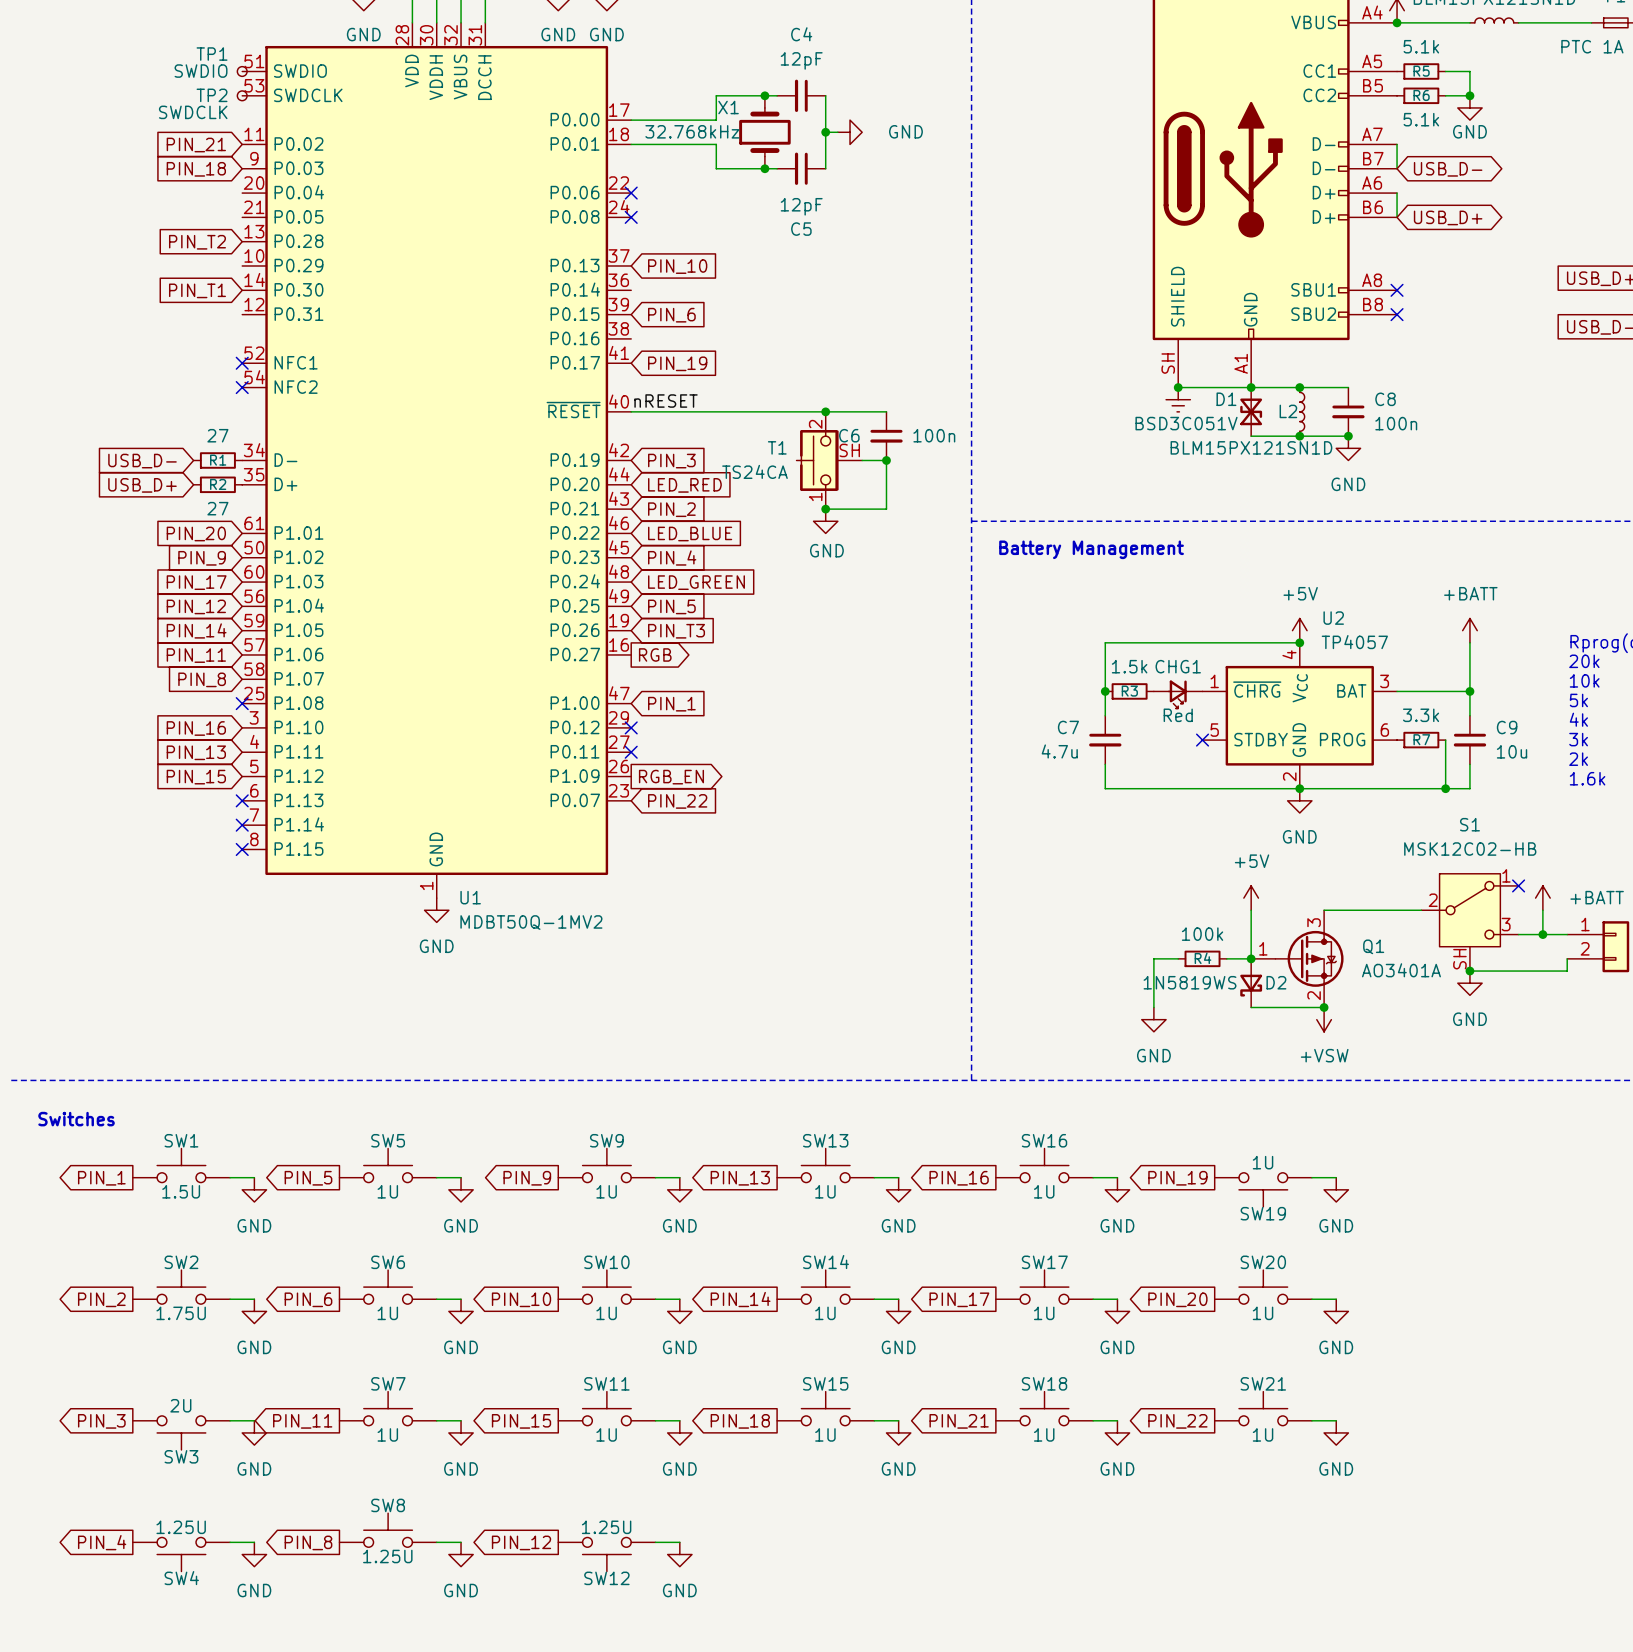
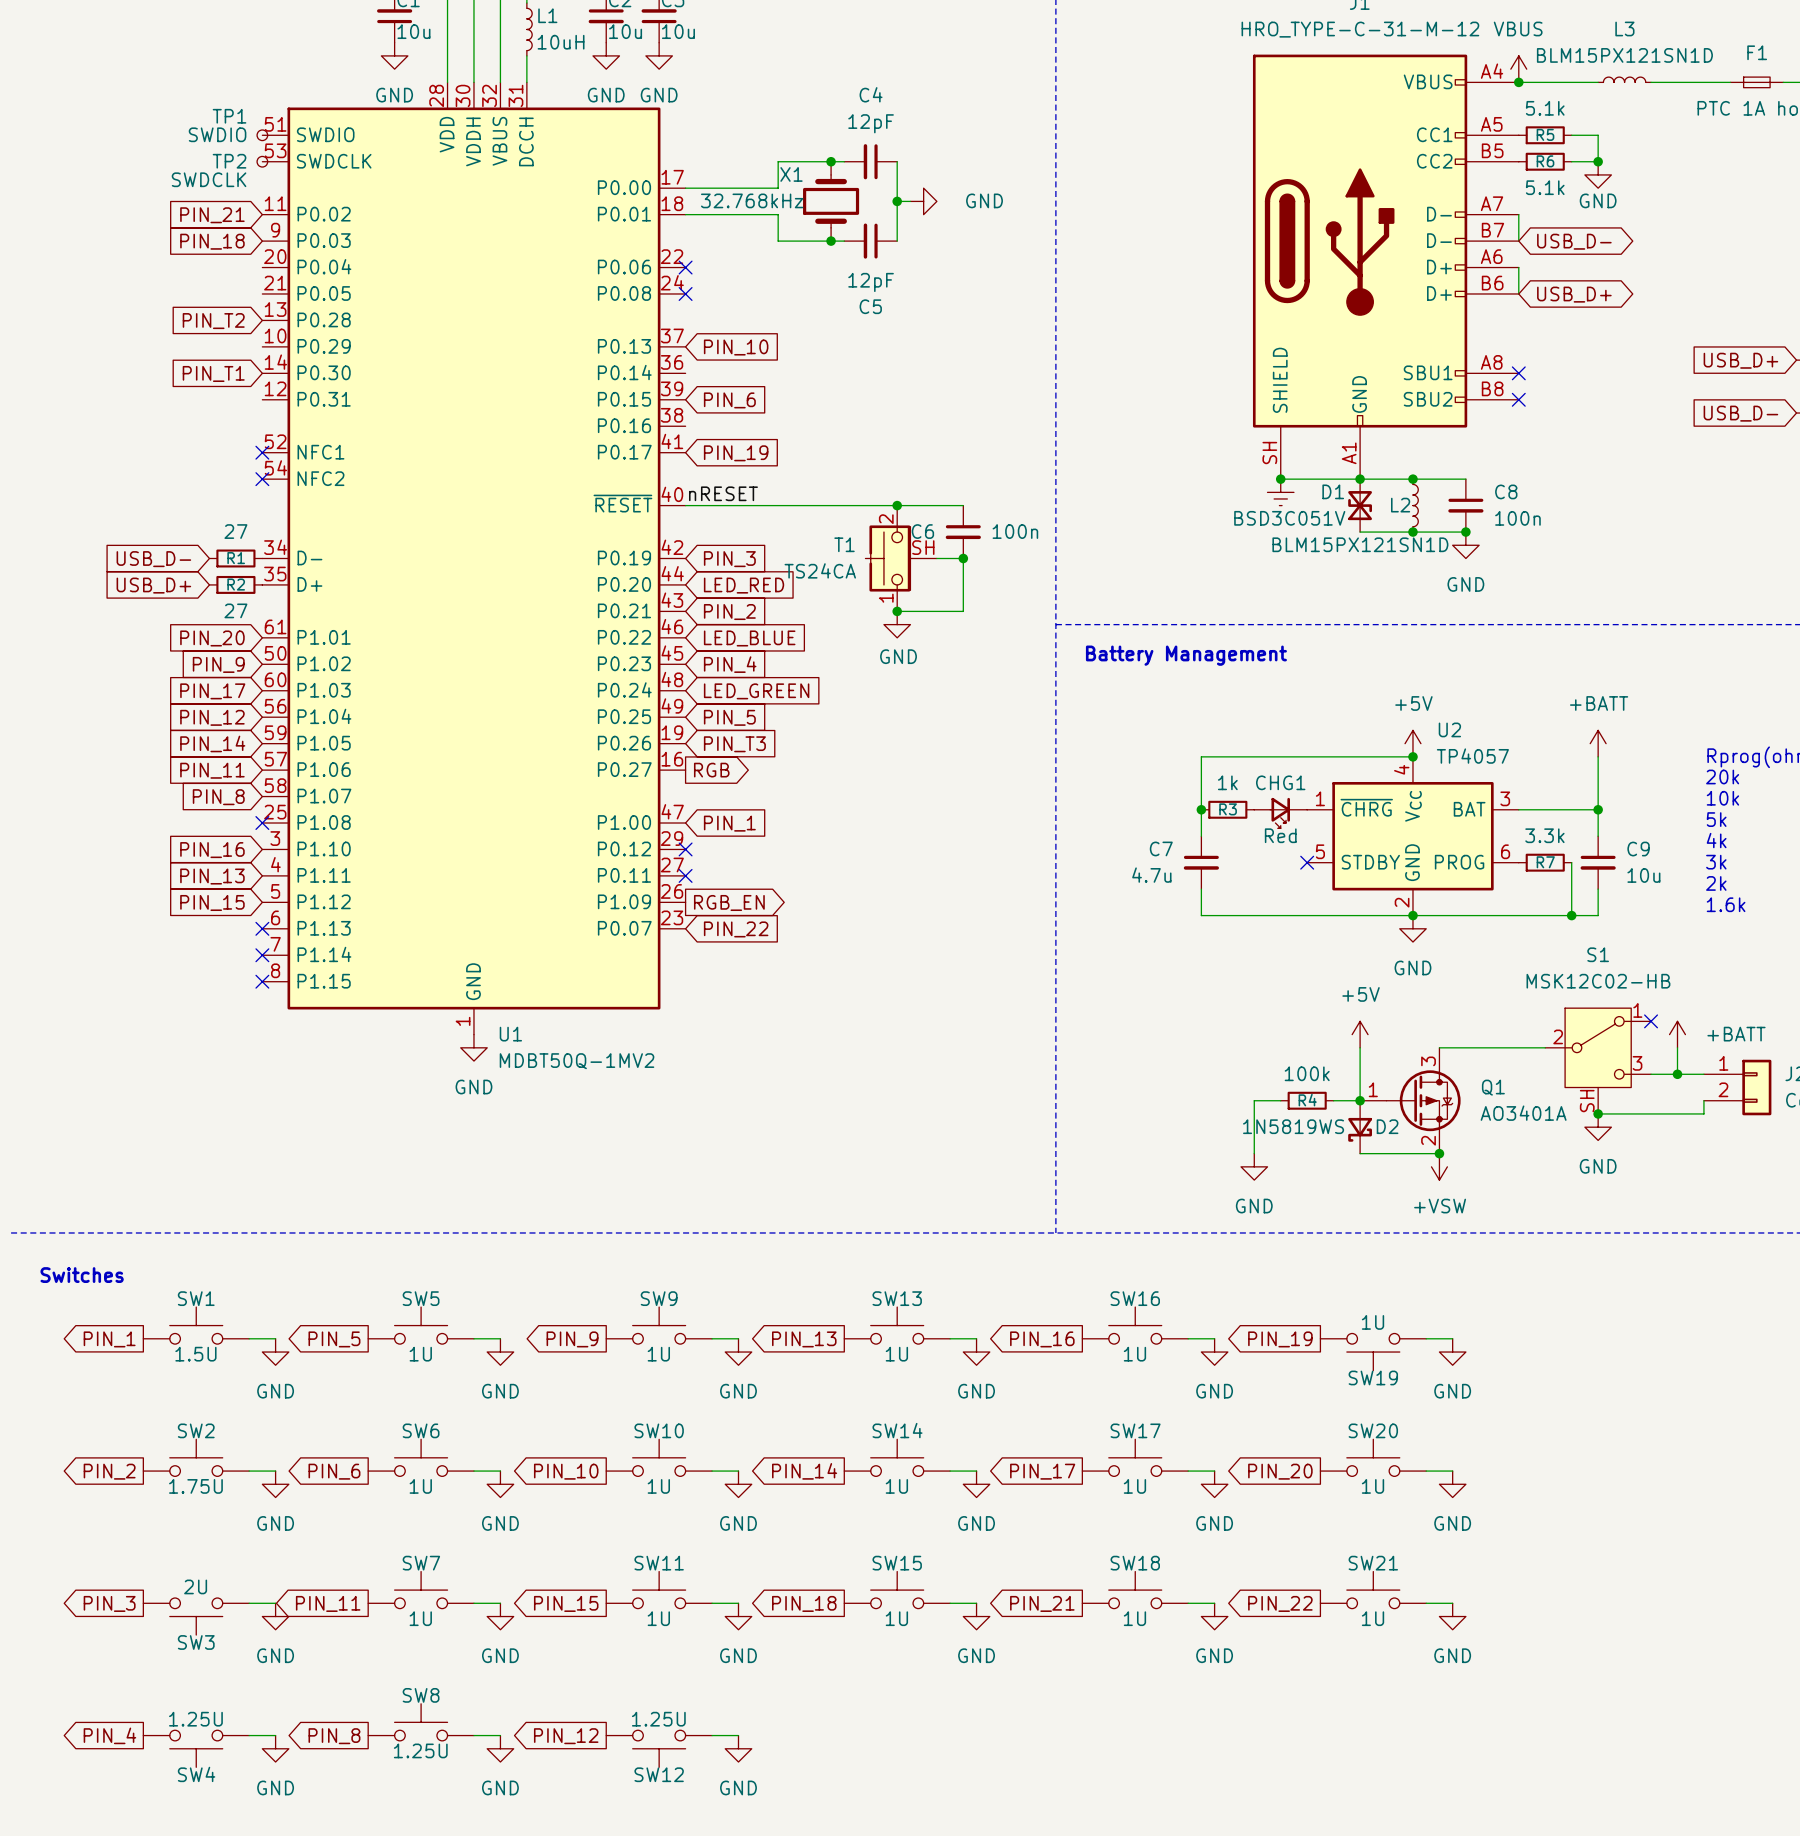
R3 value: 1.5k (1129, 666) -> 1k (1227, 782)

